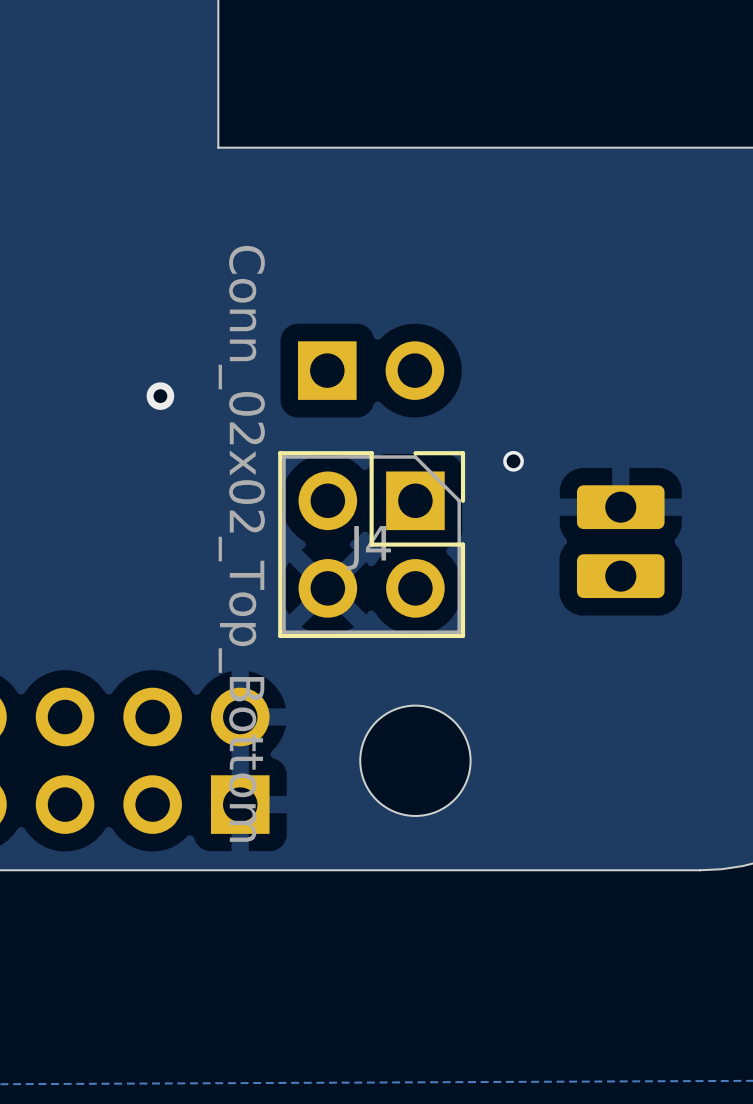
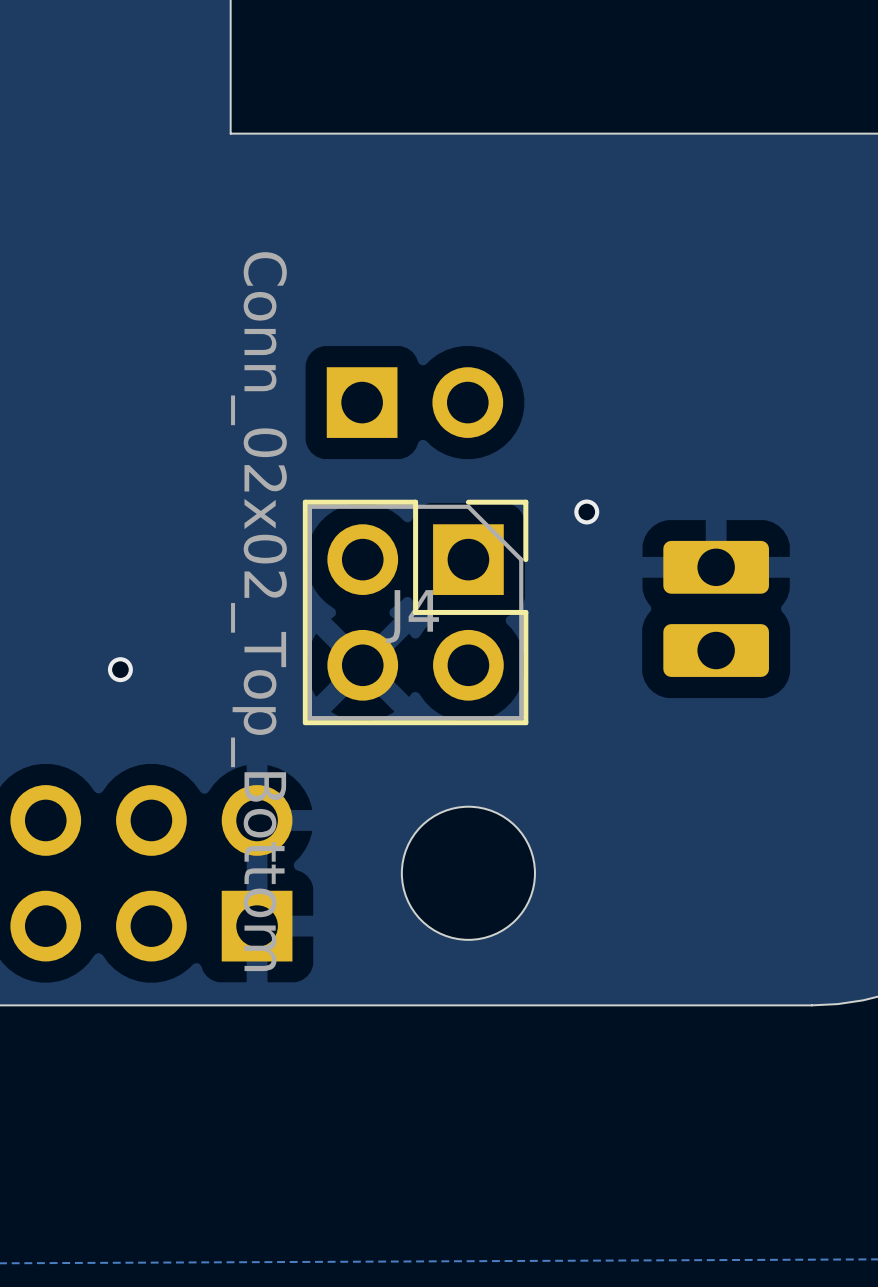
via: (160, 396) -> none
via: none -> (120, 669)

